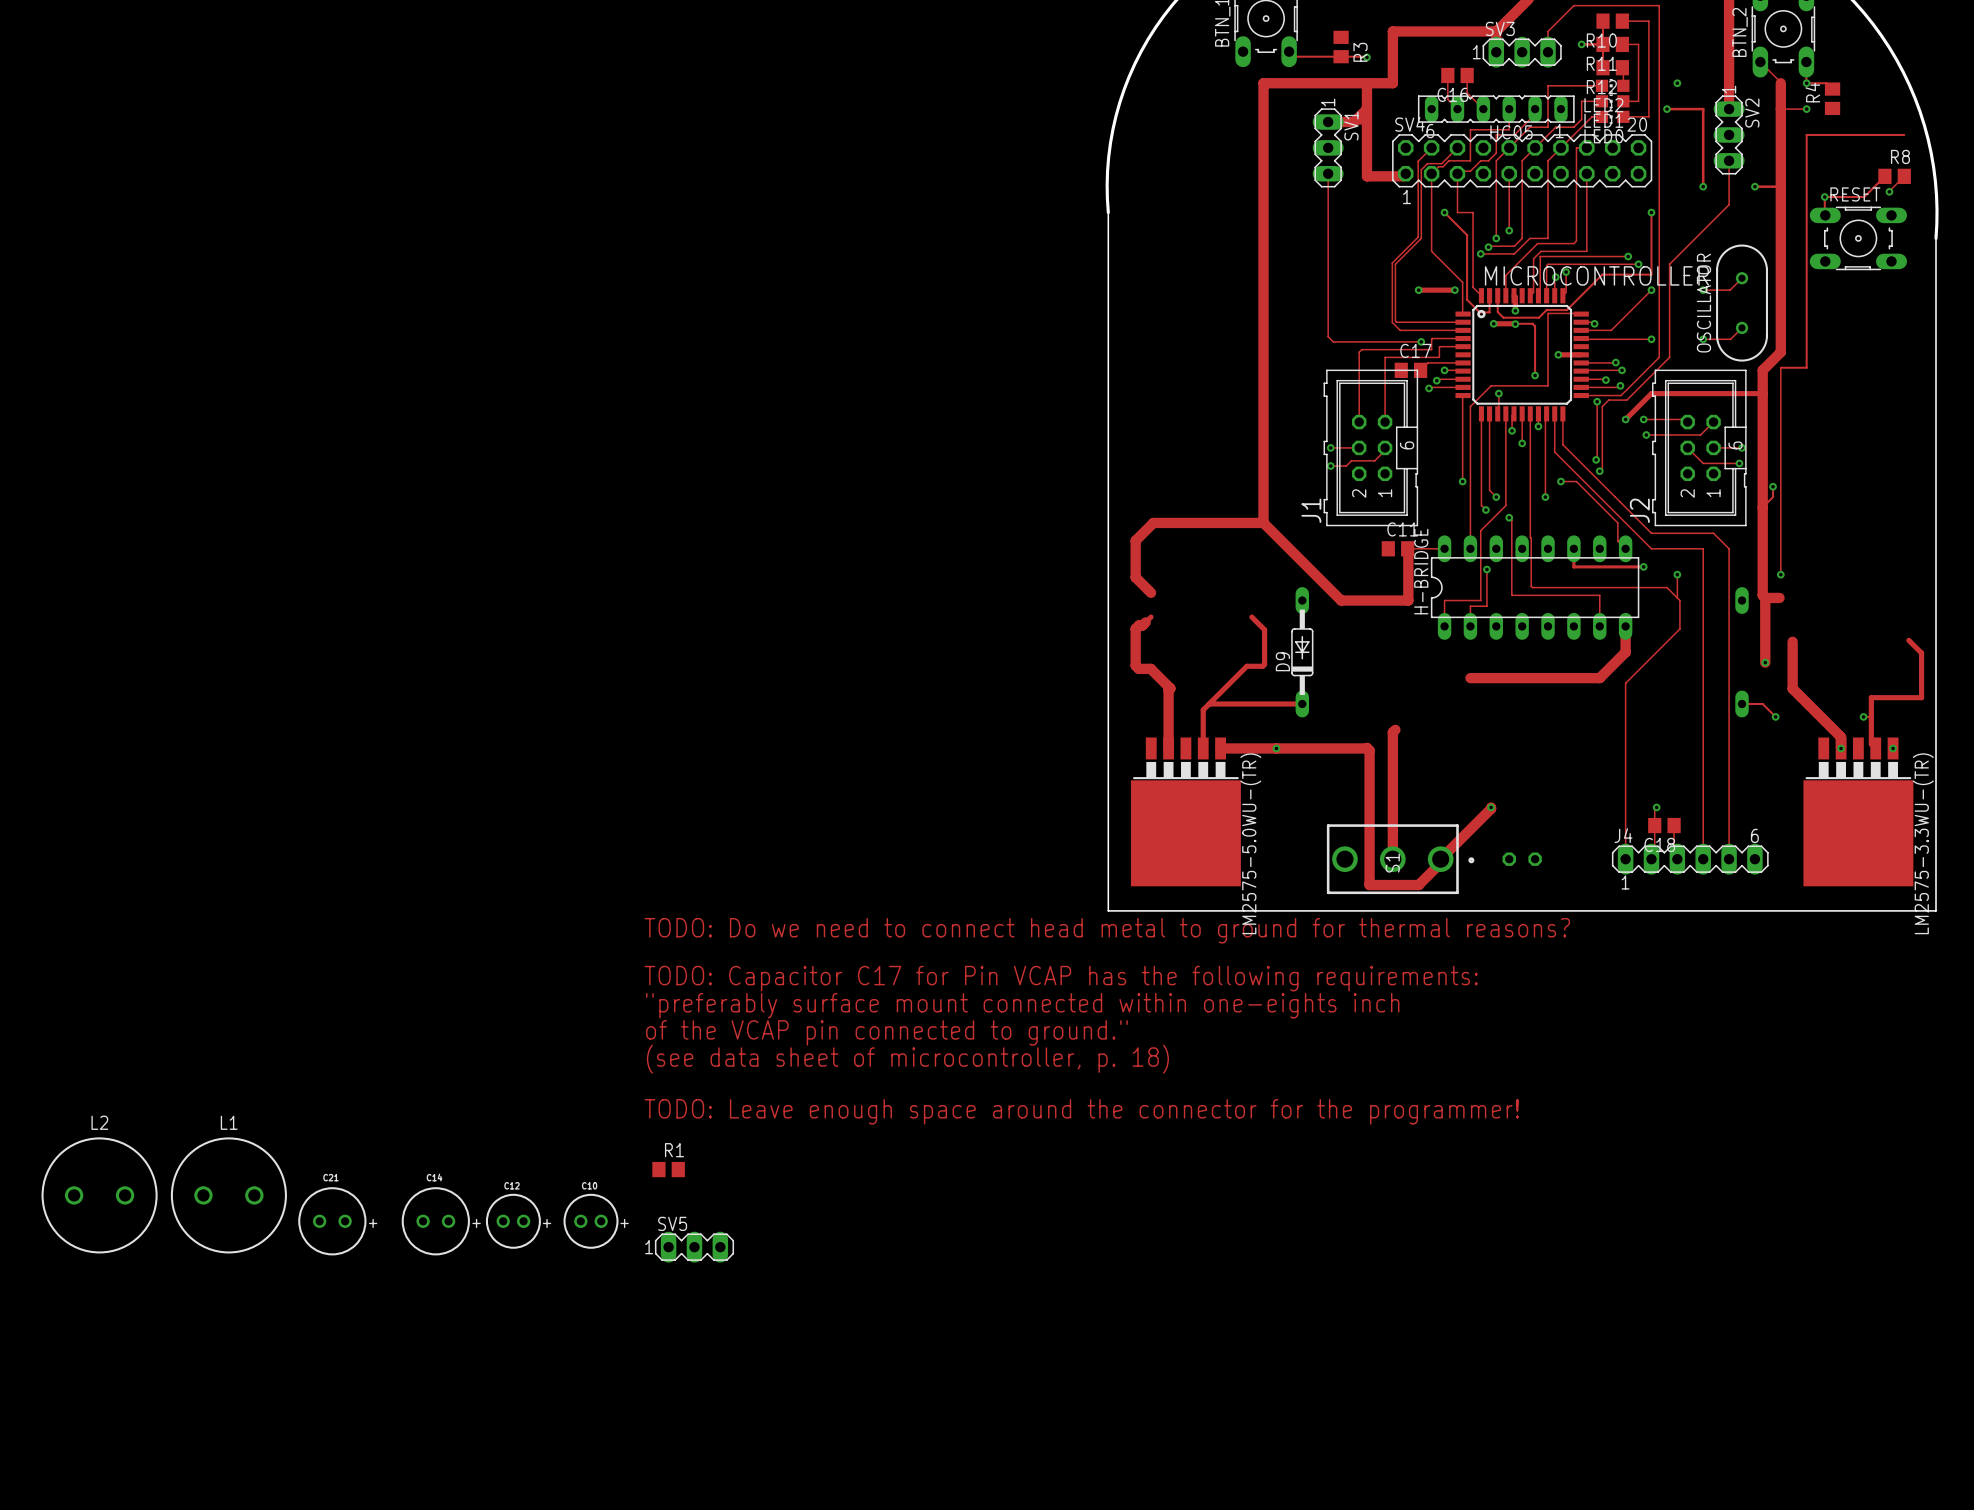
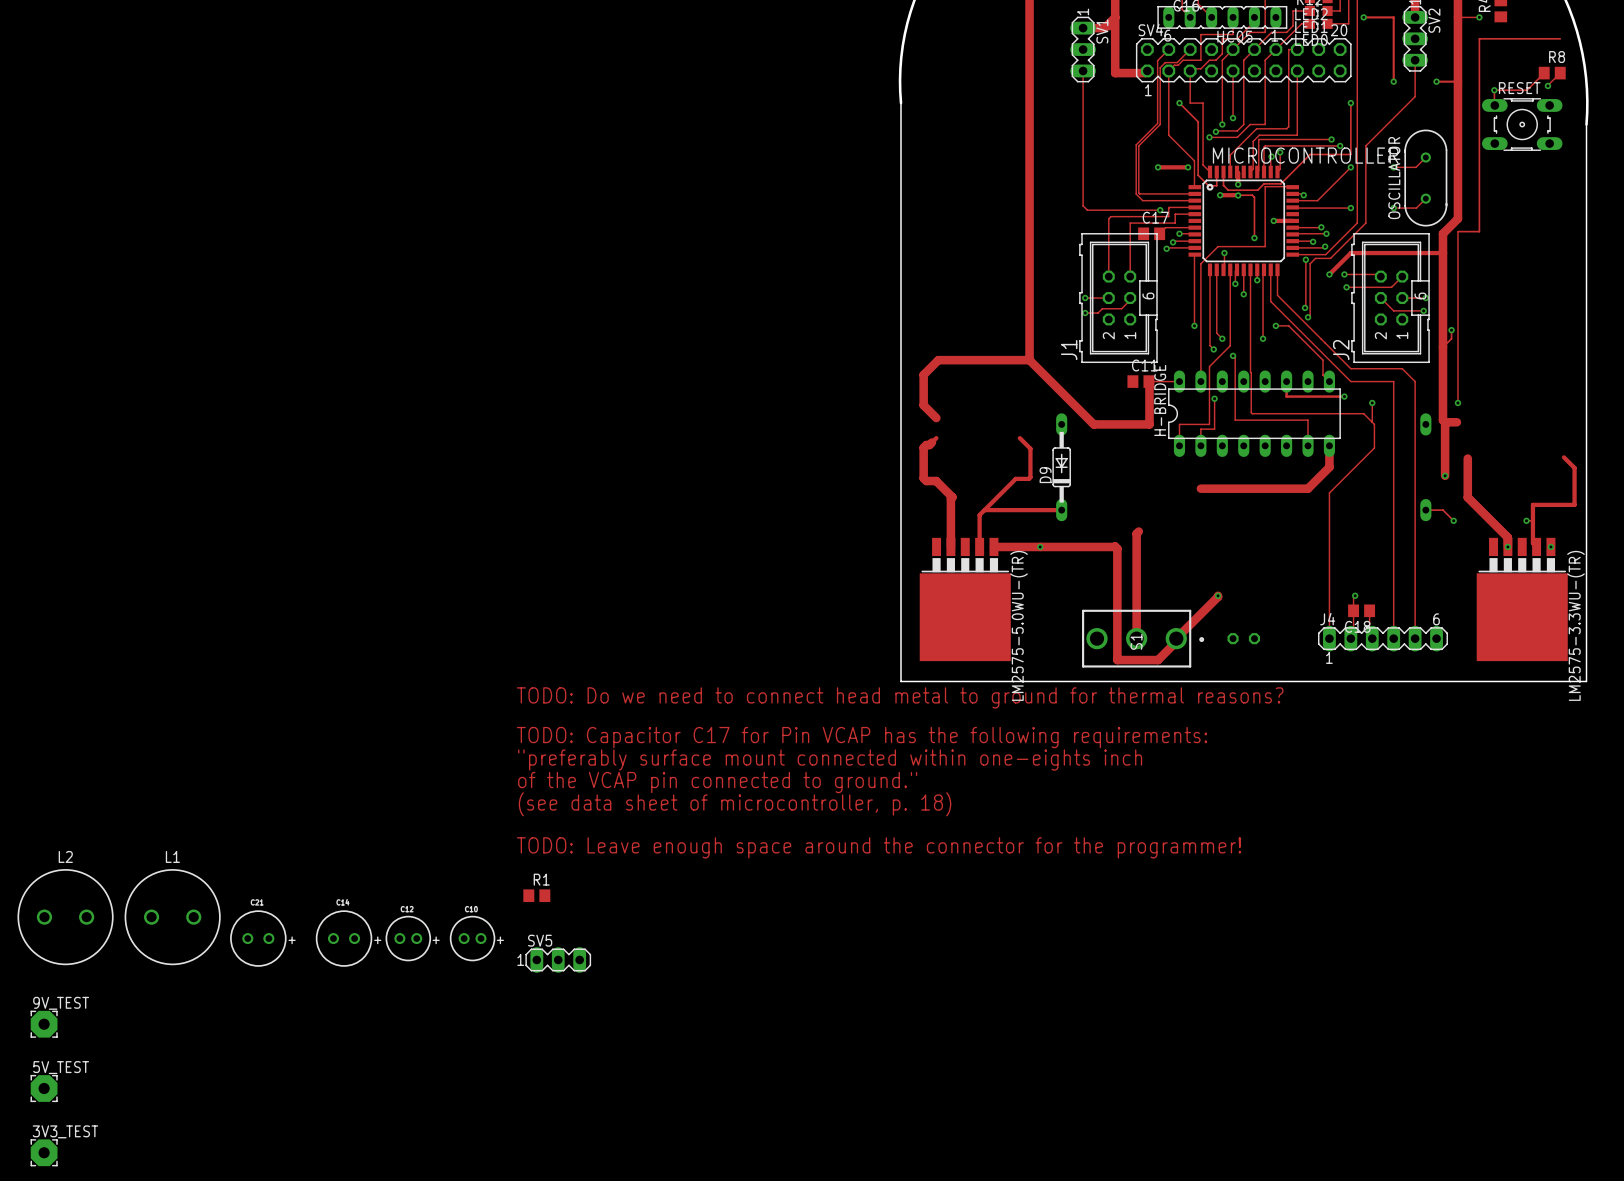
9V_TEST: none -> (44, 1024)
5V_TEST: none -> (44, 1088)
3V3_TEST: none -> (44, 1152)

